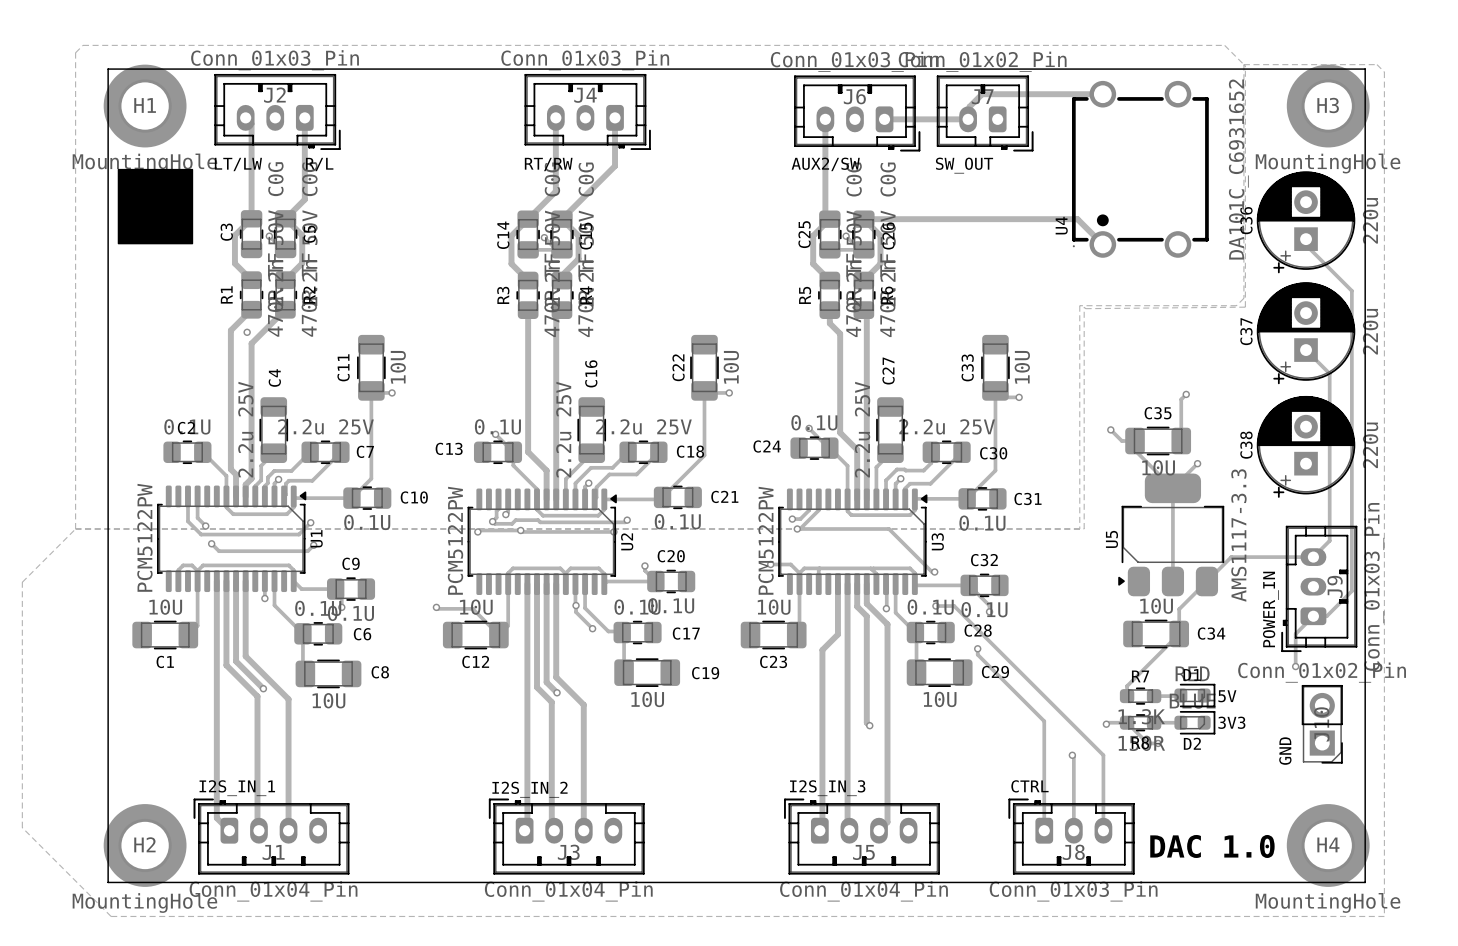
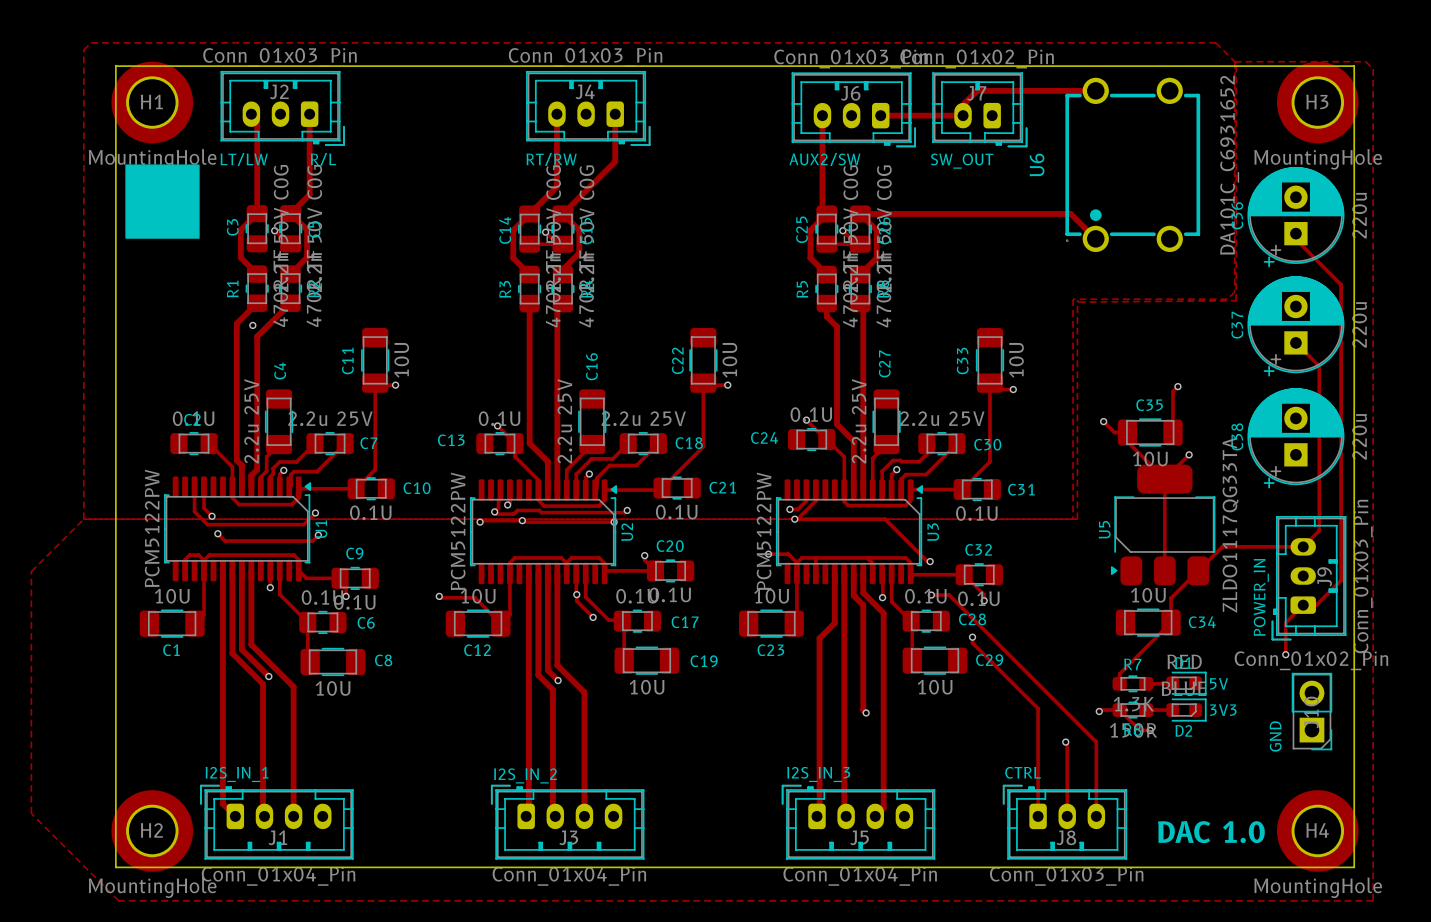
U4 name: U4 (1061, 225) -> U6 (1037, 164)
U5 value: AMS1117-3.3 (1238, 535) -> ZLDO1117QG33TA (1230, 525)

